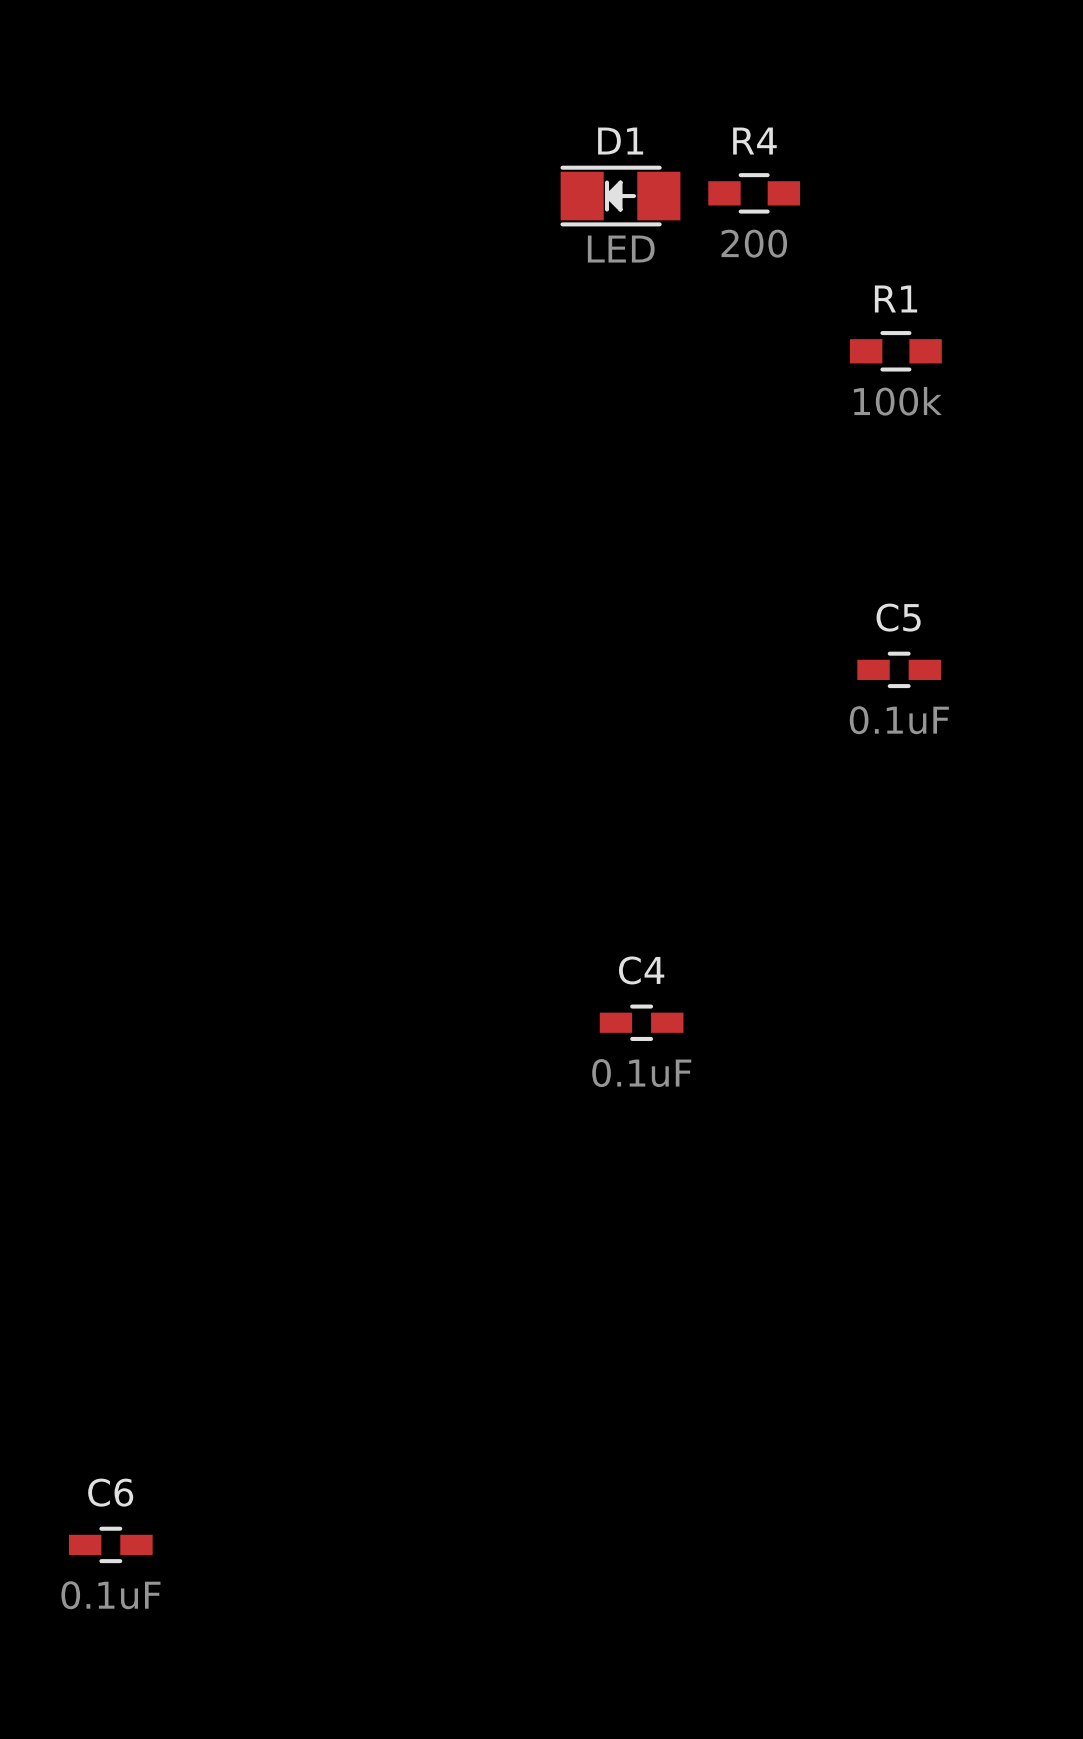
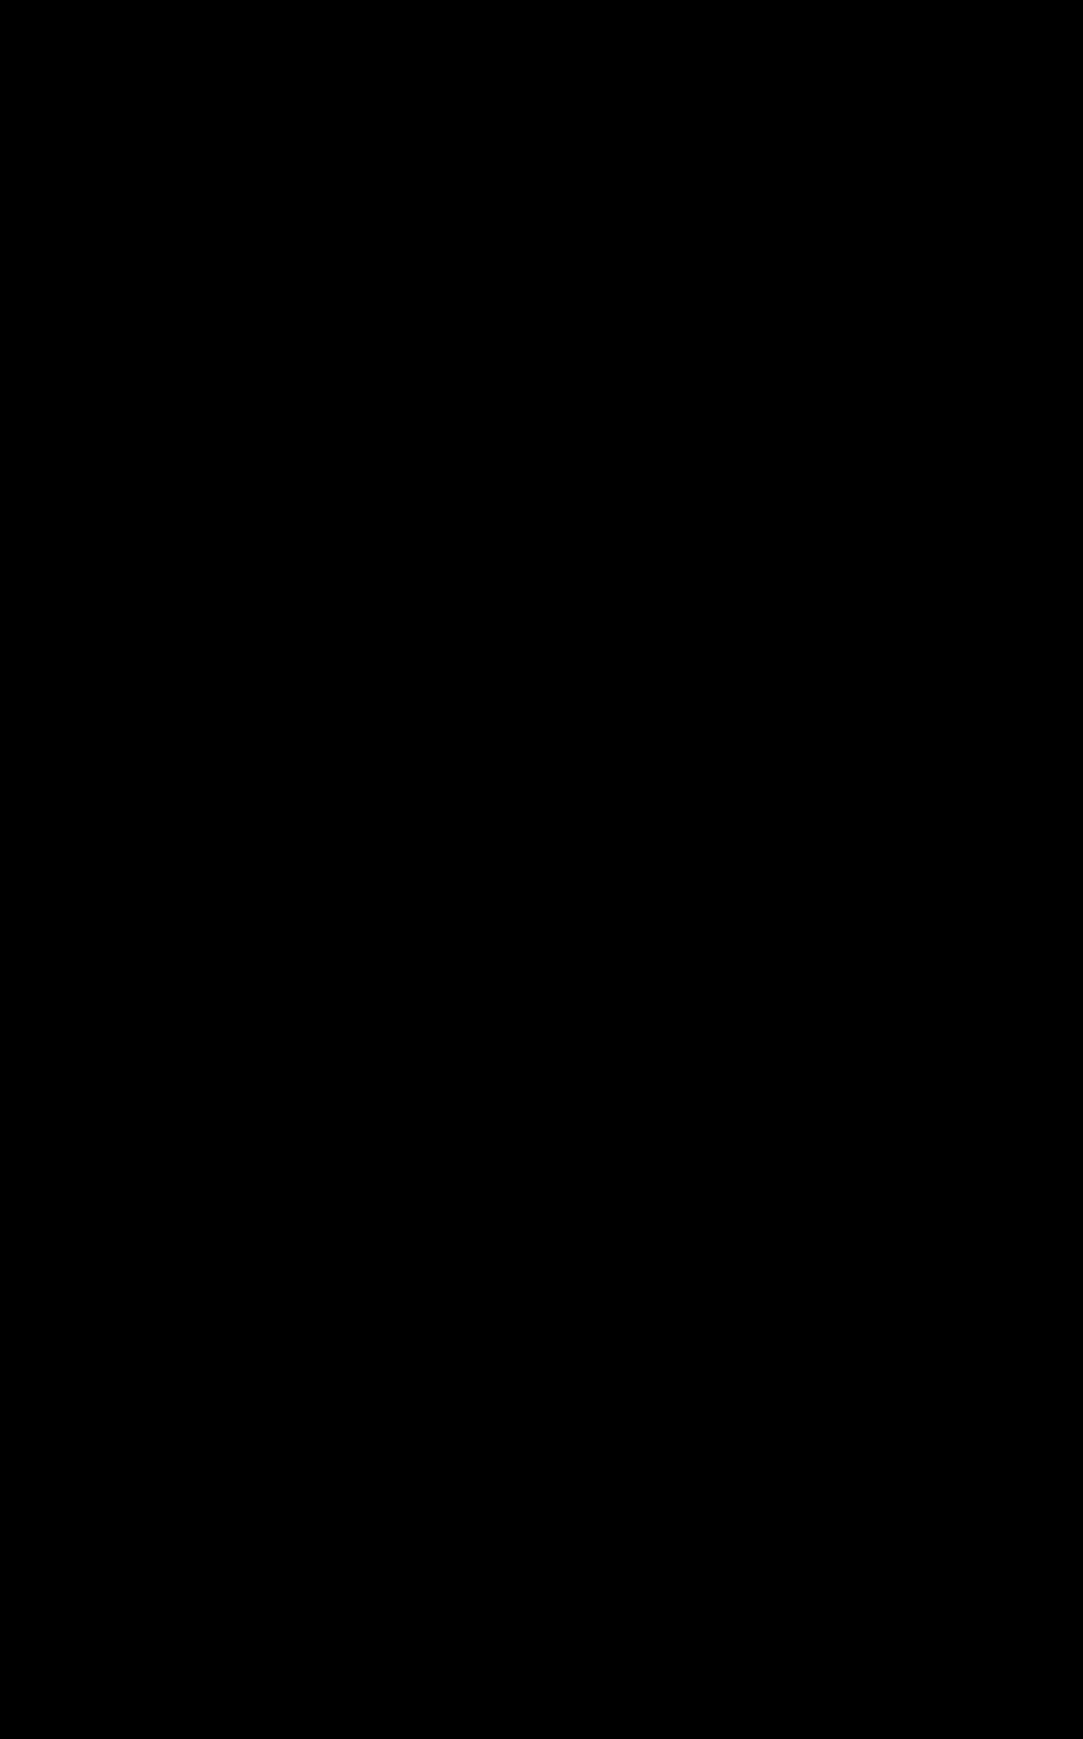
R4: 200 (754, 193) -> none
D1: LED (620, 196) -> none
R1: 100k (895, 351) -> none
C5: 0.1uF (899, 669) -> none
C4: 0.1uF (641, 1022) -> none
C6: 0.1uF (110, 1544) -> none

